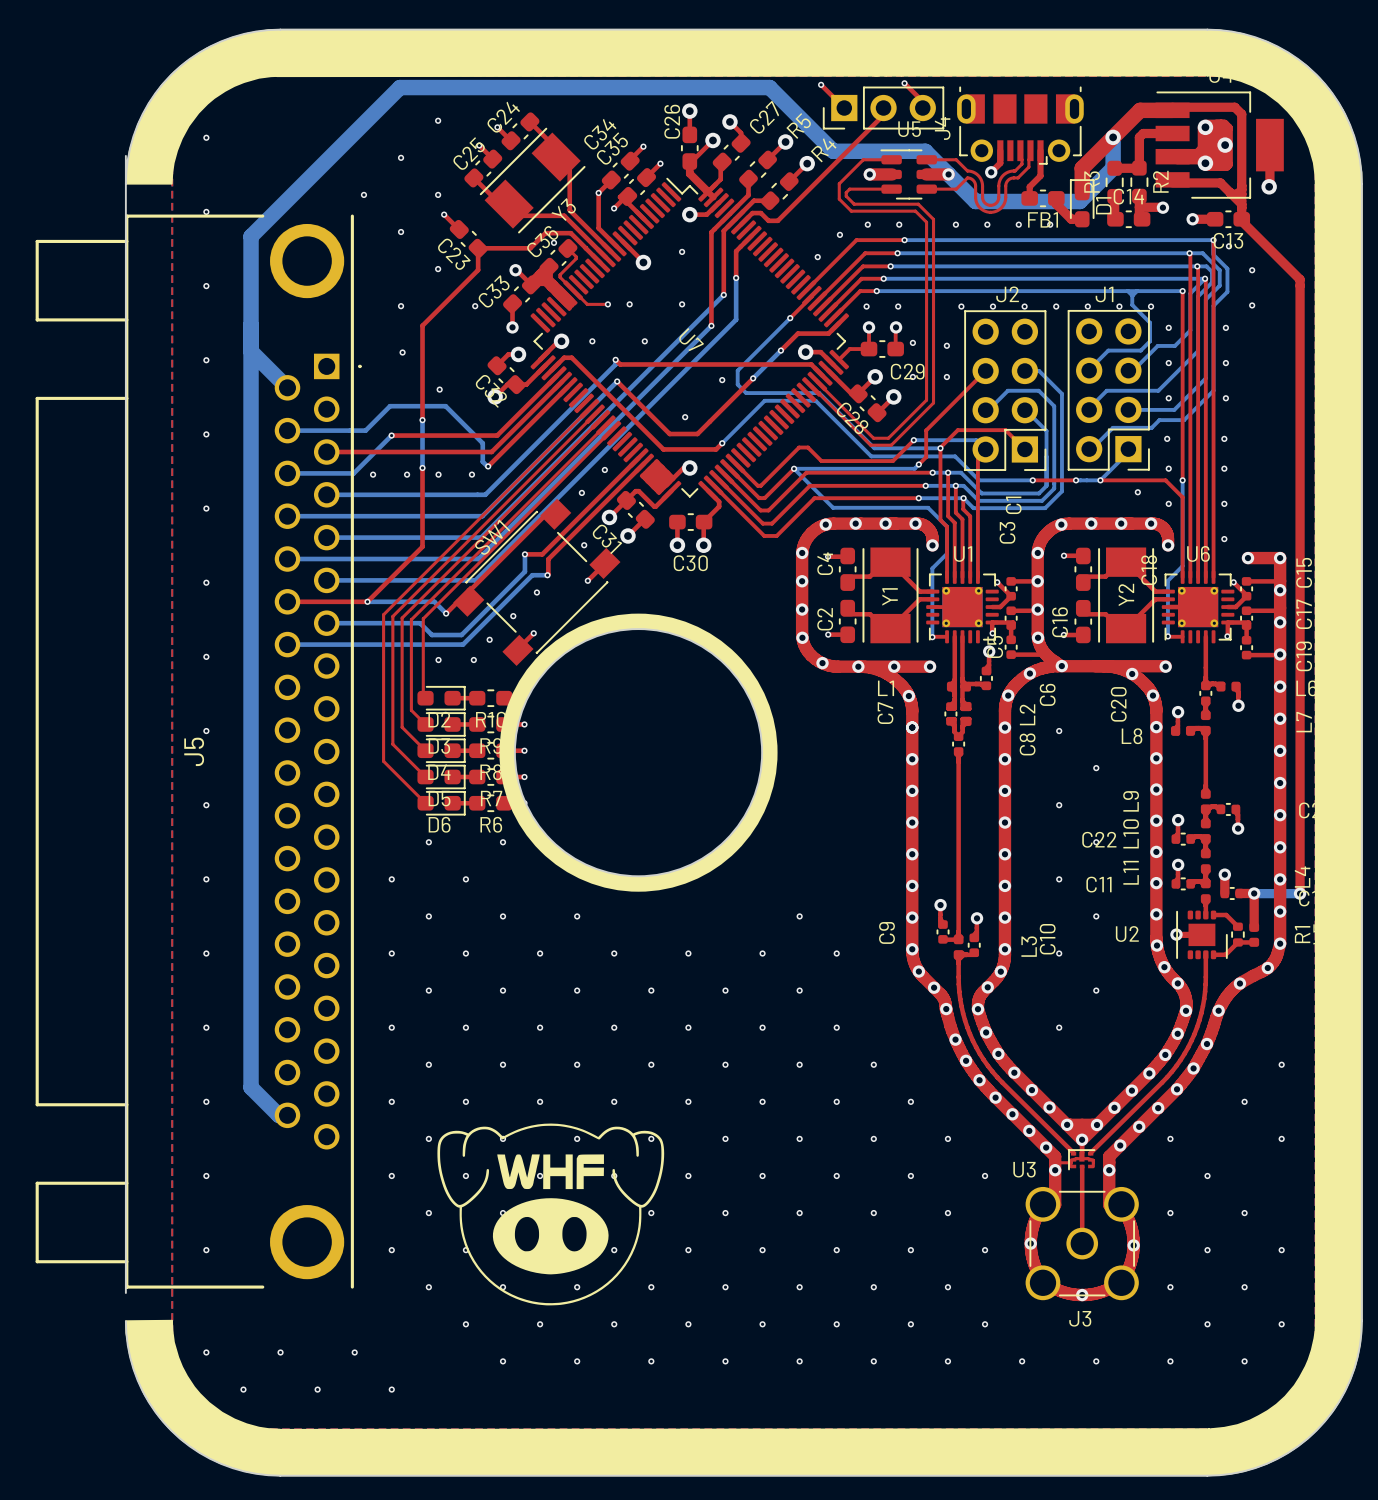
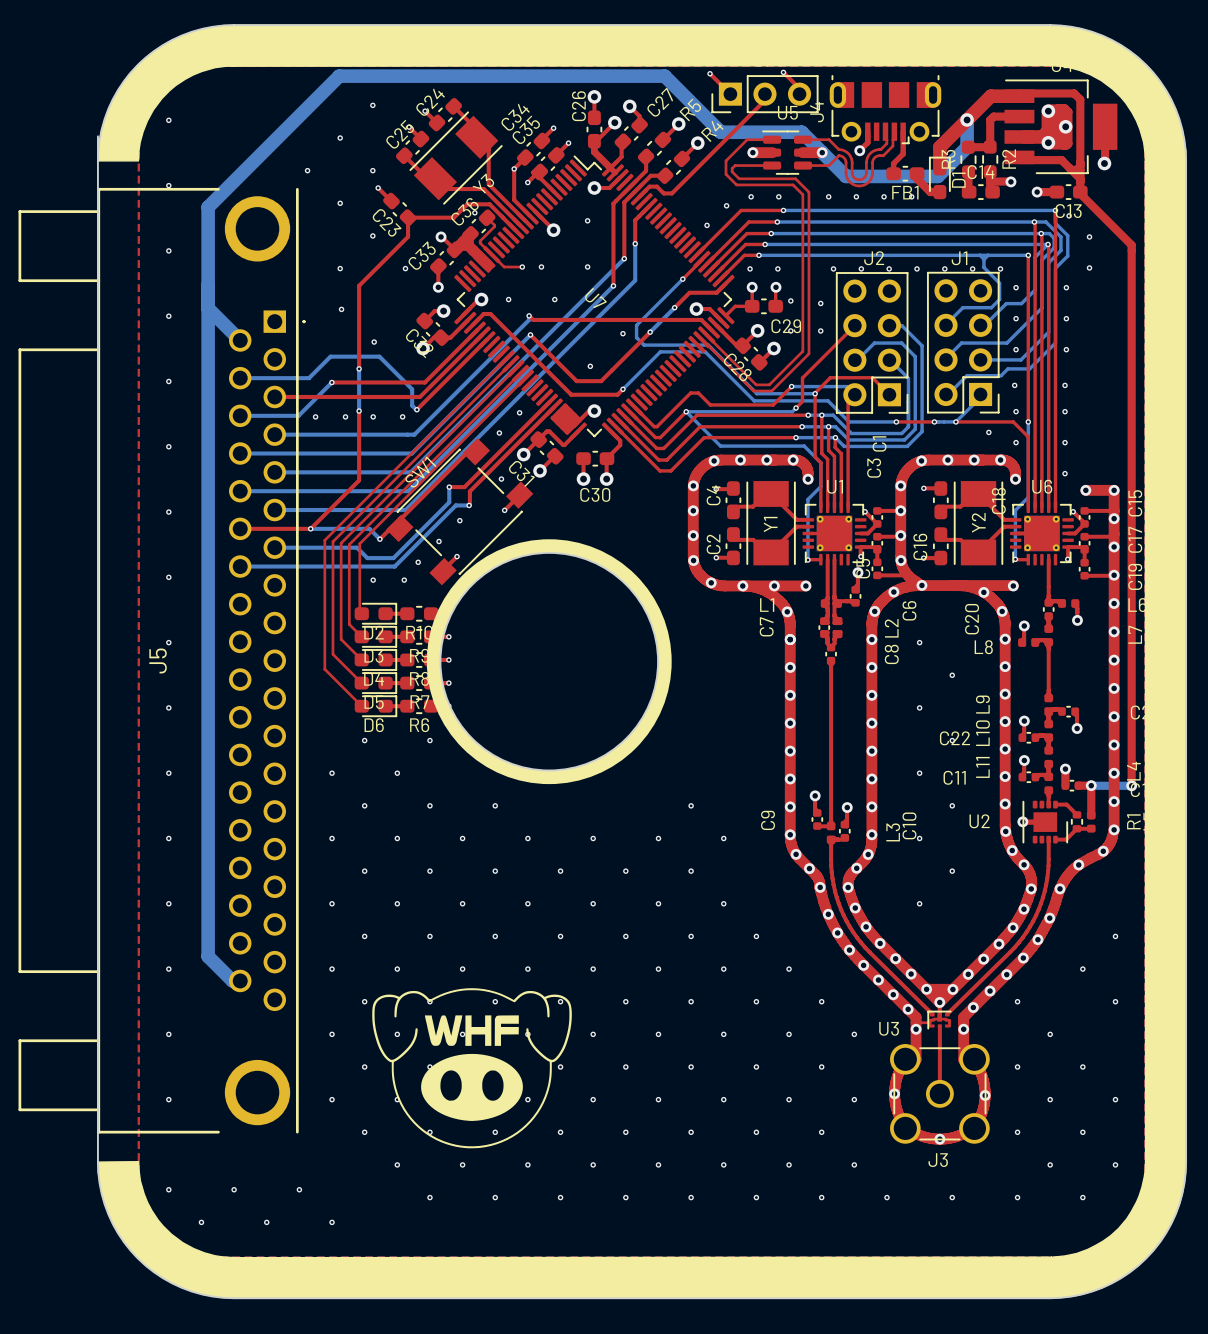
board edge: none -> (97, 1137) (97, 1162)

